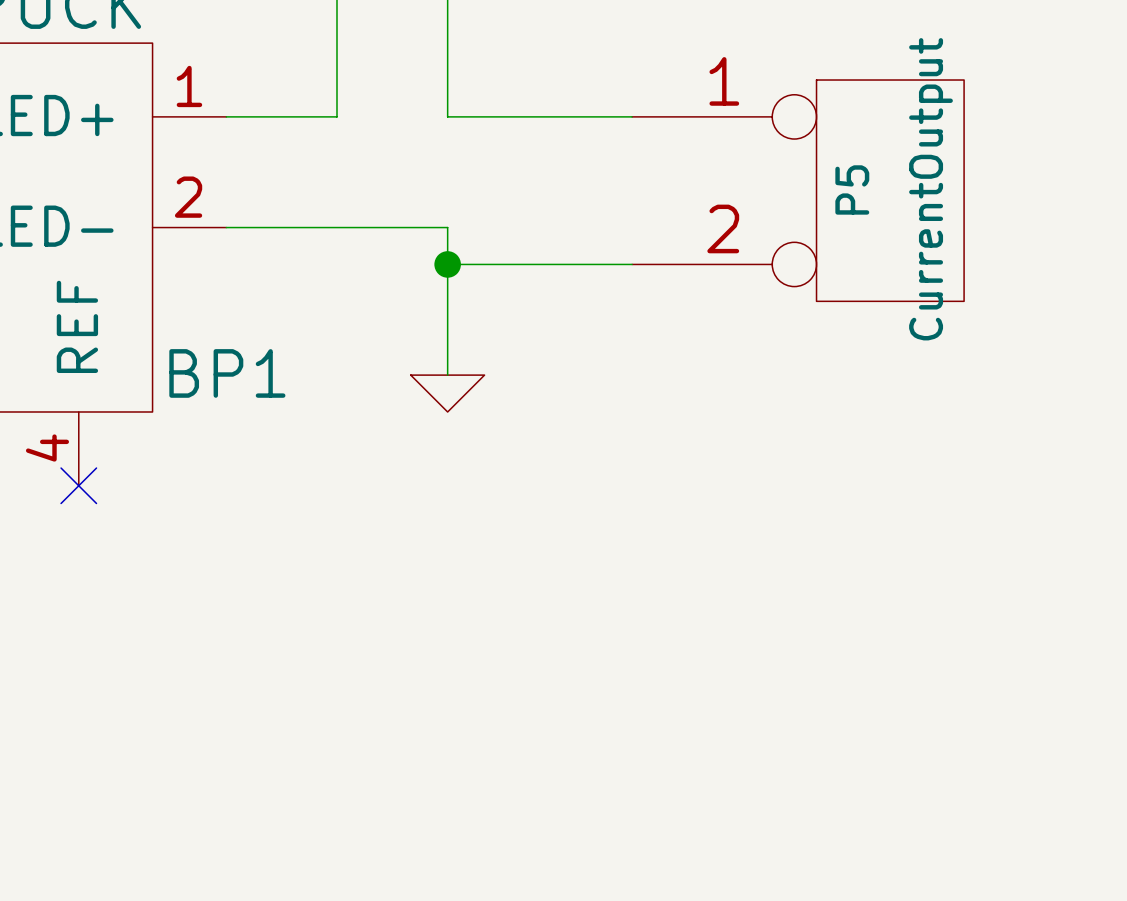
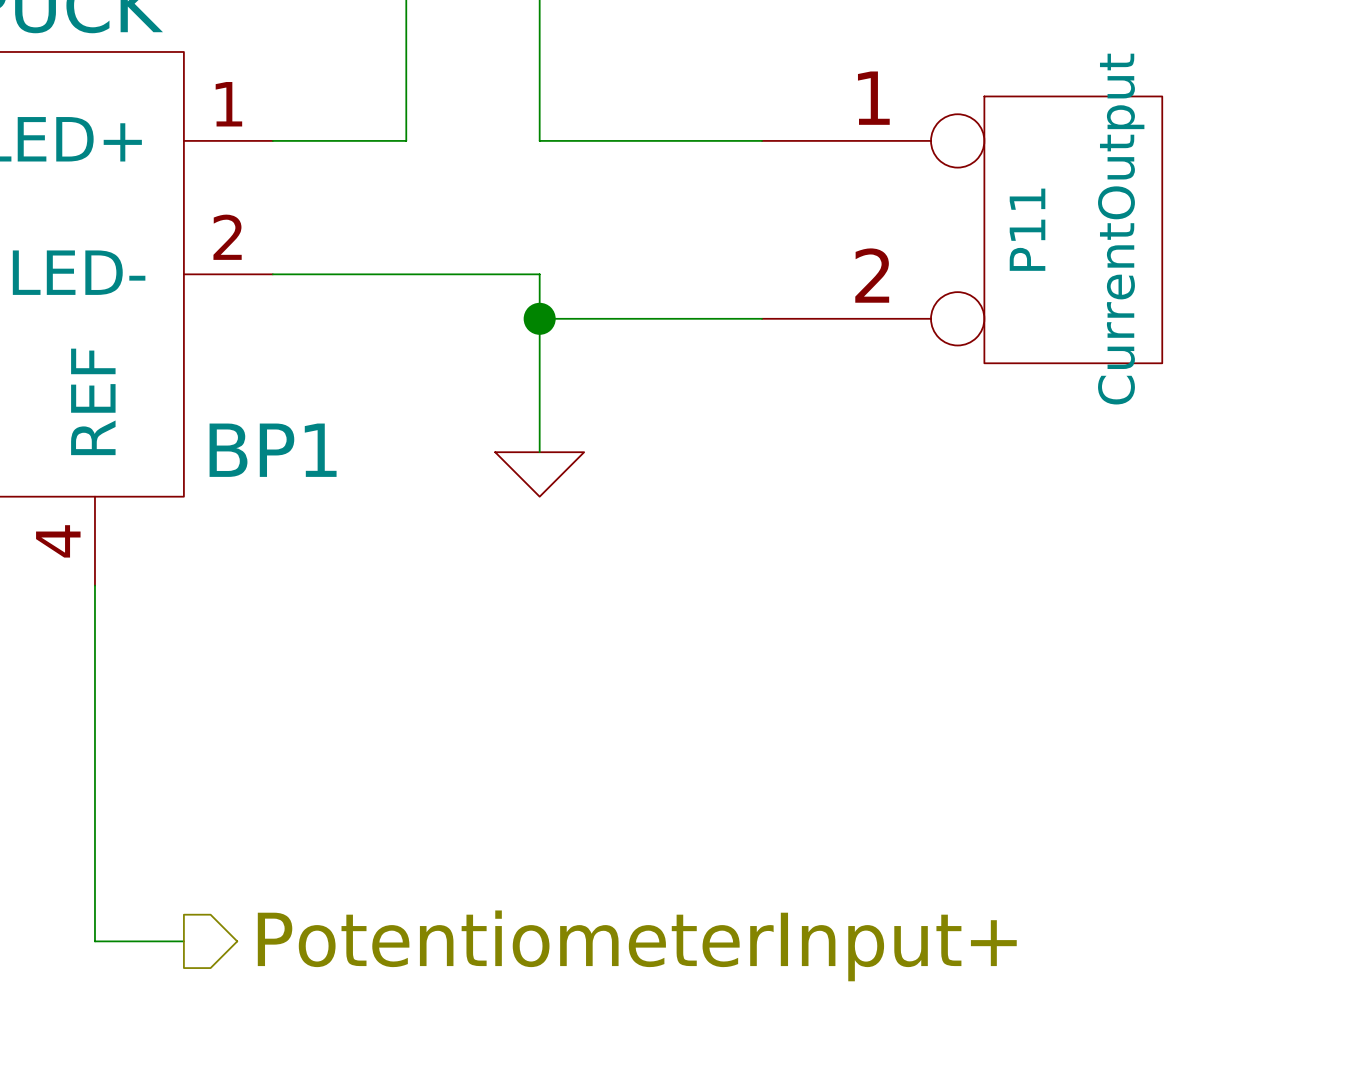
P5 name: P5 (852, 189) -> P11 (1027, 229)
wire: none -> (94, 585) (94, 941) (183, 941)
no-connect mark: (78, 485) -> none
hierarchical label: none -> PotentiometerInput+ (637, 945)

